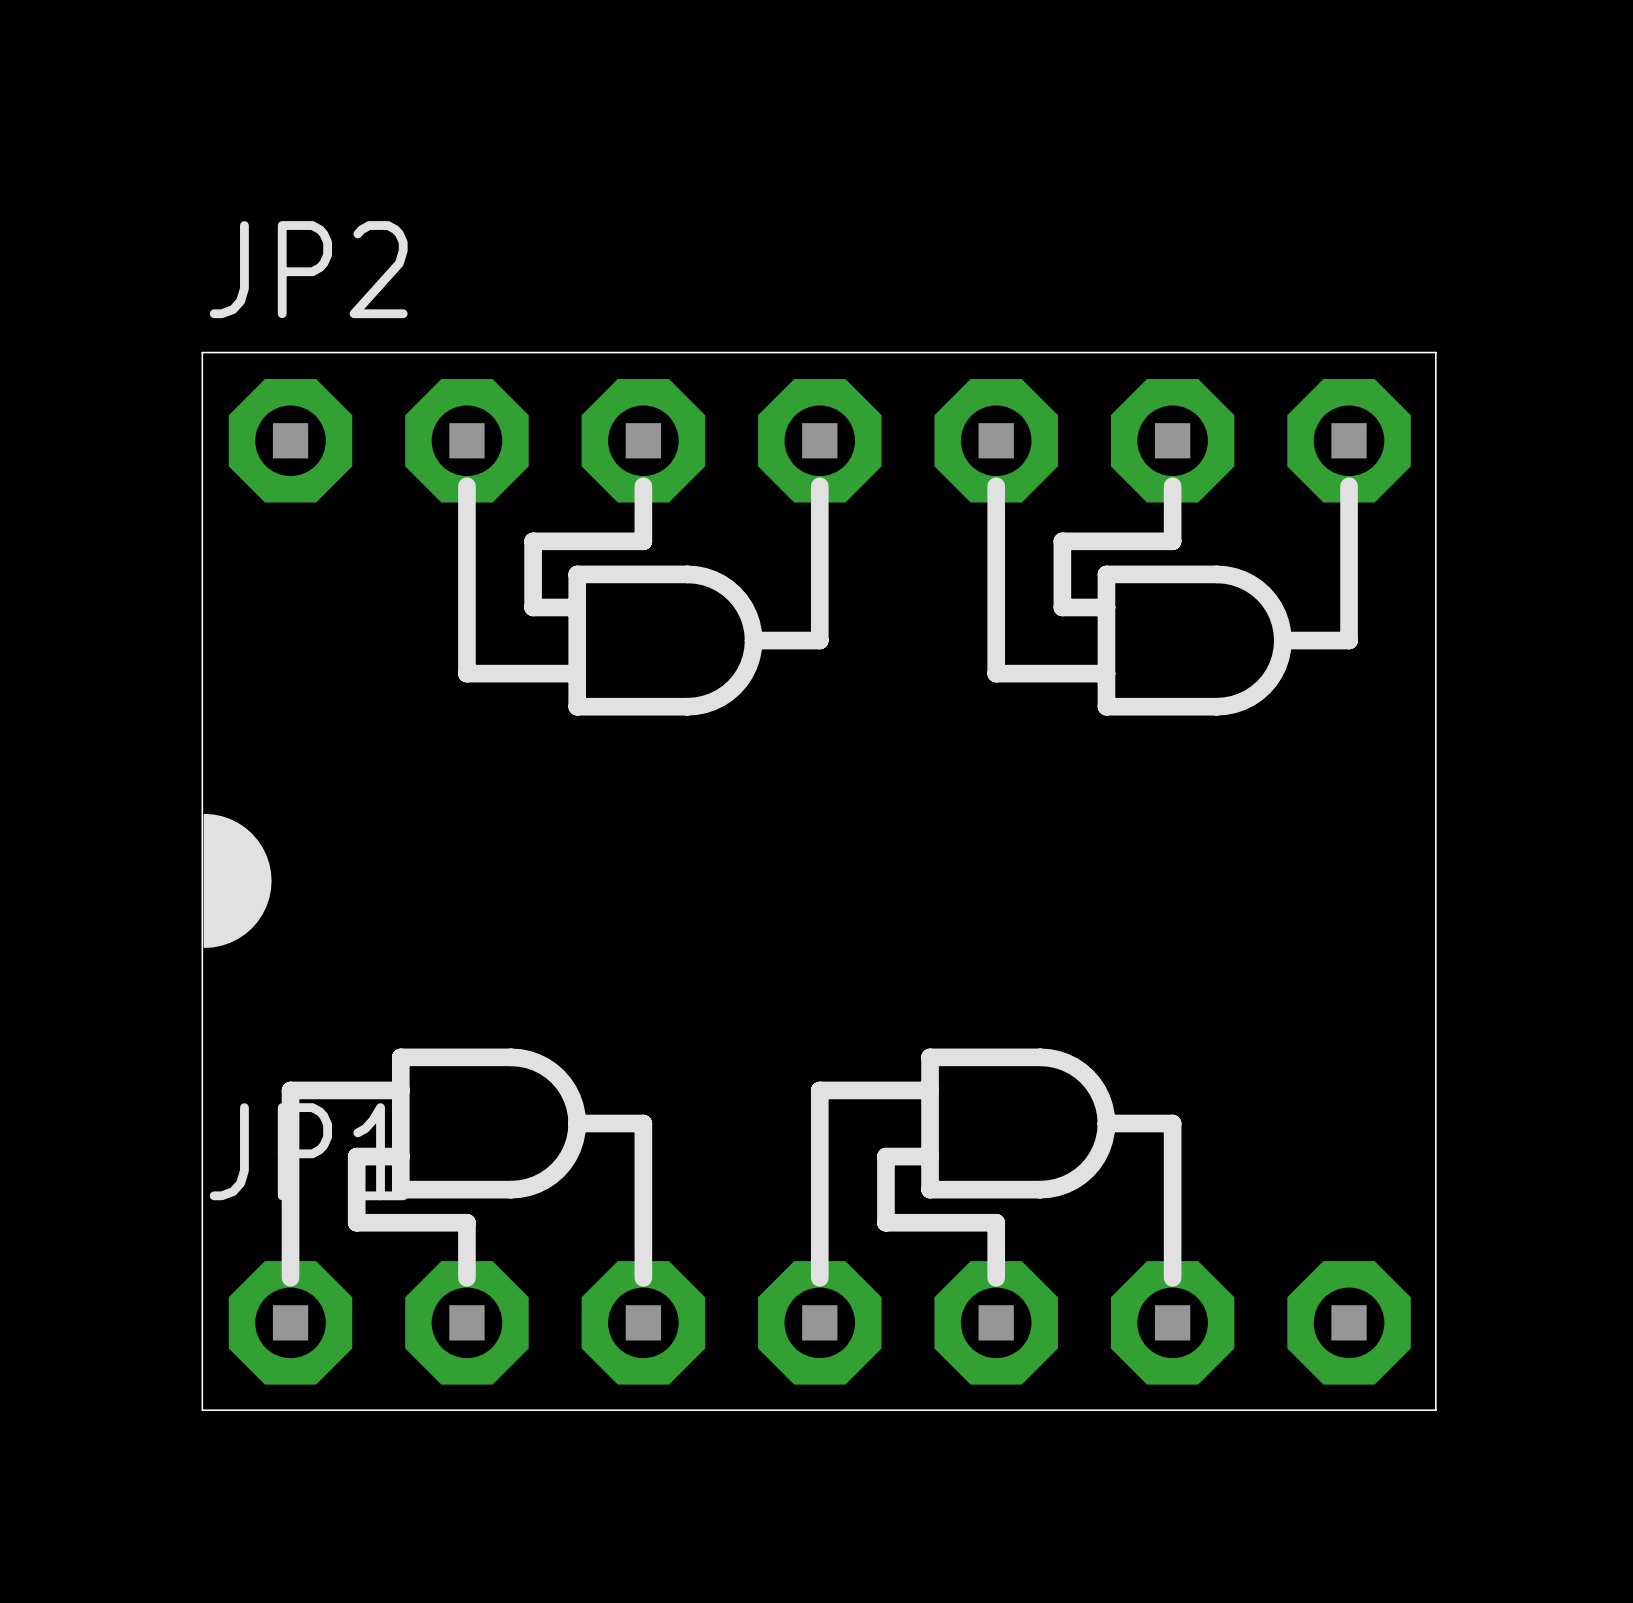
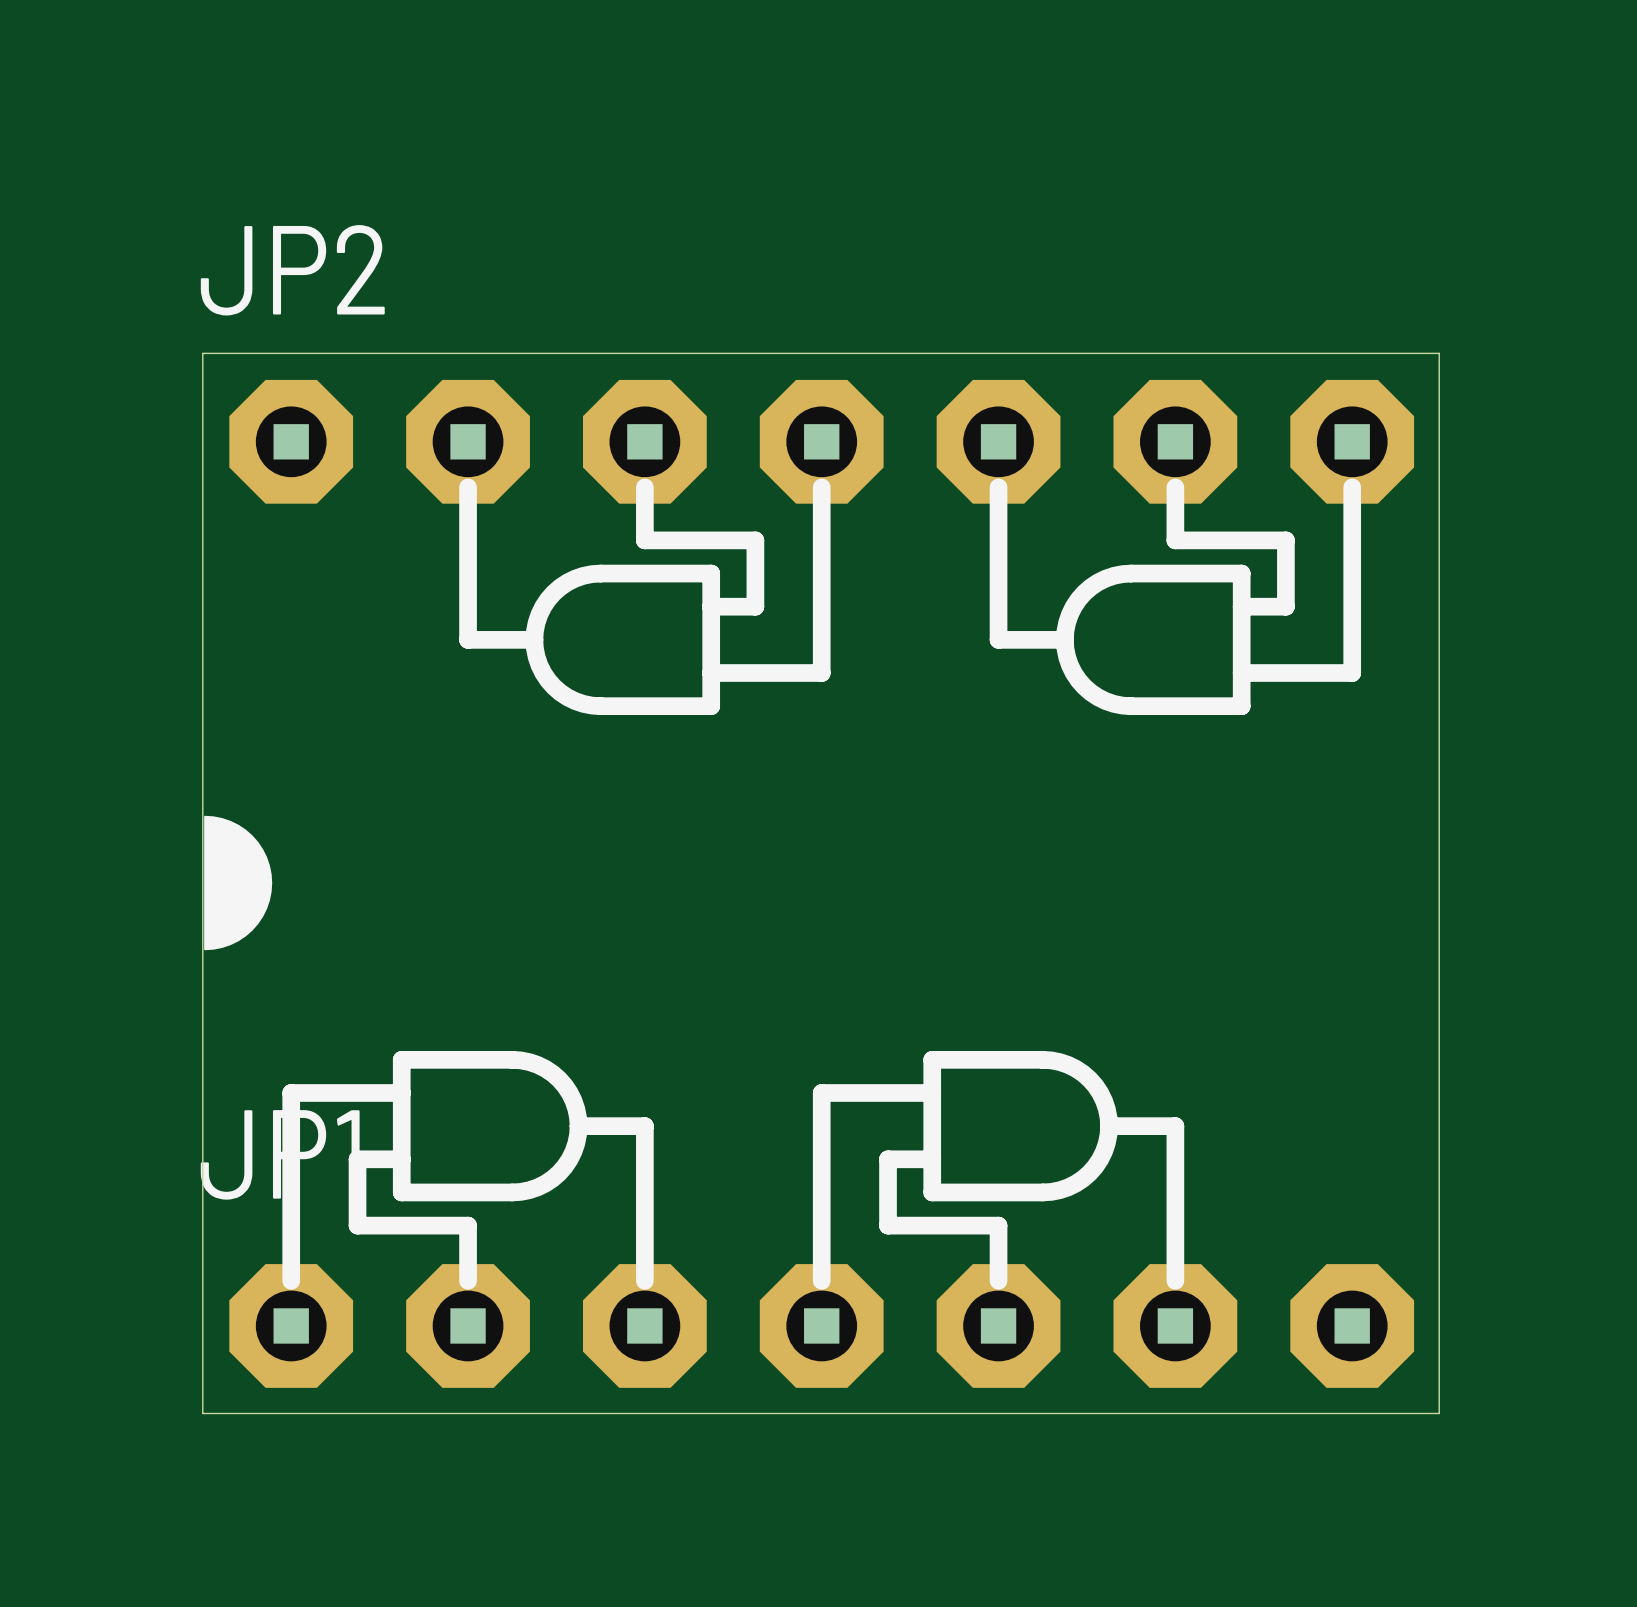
line: (643, 539) (643, 541) (533, 541) (533, 607) (577, 607) -> (644, 540) (755, 540) (755, 606) (711, 606)
line: (1172, 539) (1172, 541) (1062, 541) (1062, 607) (1106, 607) -> (1175, 540) (1285, 540) (1285, 606) (1241, 606)
line: (466, 638) (466, 673) (577, 673) -> (468, 639) (534, 639)
line: (996, 638) (996, 673) (1106, 673) -> (998, 639) (1064, 639)
line: (753, 640) (819, 640) -> (711, 673) (821, 673) (821, 642)
line: (753, 640) (748, 665) (739, 680) (727, 693) (712, 701) (687, 706) (577, 706) (577, 574) (687, 574) (712, 579) (727, 588) (739, 600) (748, 615) (753, 640) -> (534, 639) (539, 614) (548, 599) (560, 587) (575, 578) (600, 573) (711, 573) (711, 706) (600, 706) (575, 701) (560, 692) (548, 680) (539, 665) (534, 639)
line: (1282, 640) (1349, 640) -> (1241, 673) (1352, 673) (1352, 642)
line: (1282, 640) (1277, 665) (1269, 680) (1256, 693) (1242, 701) (1216, 706) (1106, 706) (1106, 574) (1216, 574) (1242, 579) (1256, 588) (1269, 600) (1277, 615) (1282, 640) -> (1064, 639) (1067, 622) (1073, 606) (1090, 587) (1105, 578) (1131, 573) (1241, 573) (1241, 706) (1131, 706) (1105, 701) (1090, 692) (1078, 680) (1069, 665) (1064, 639)

